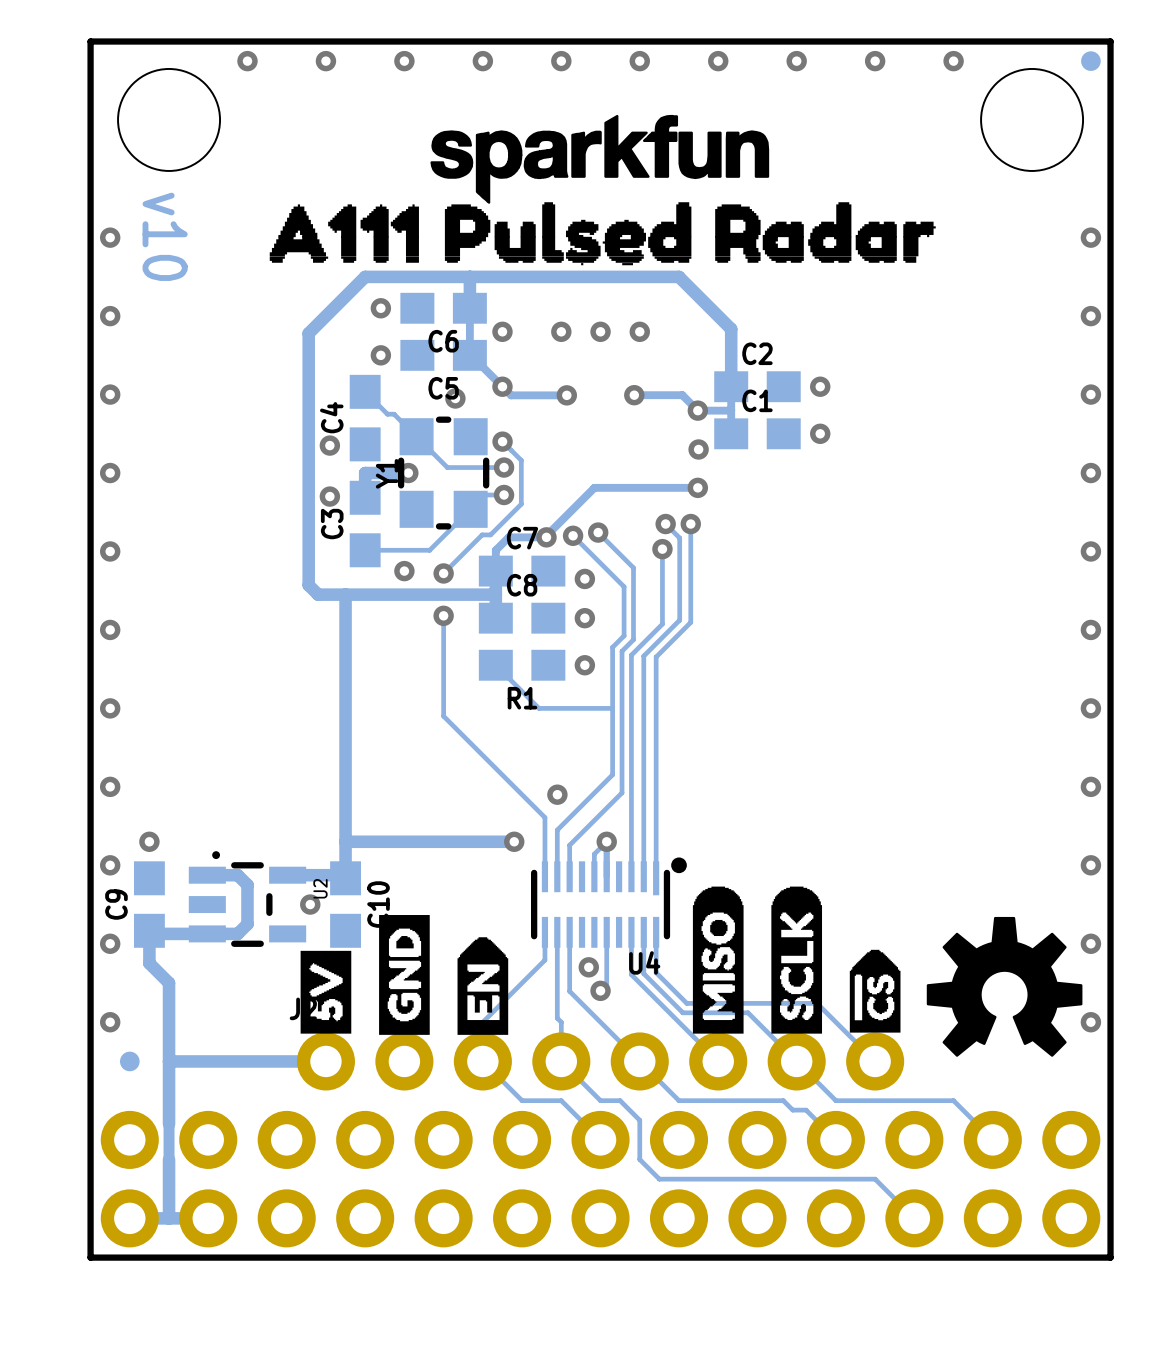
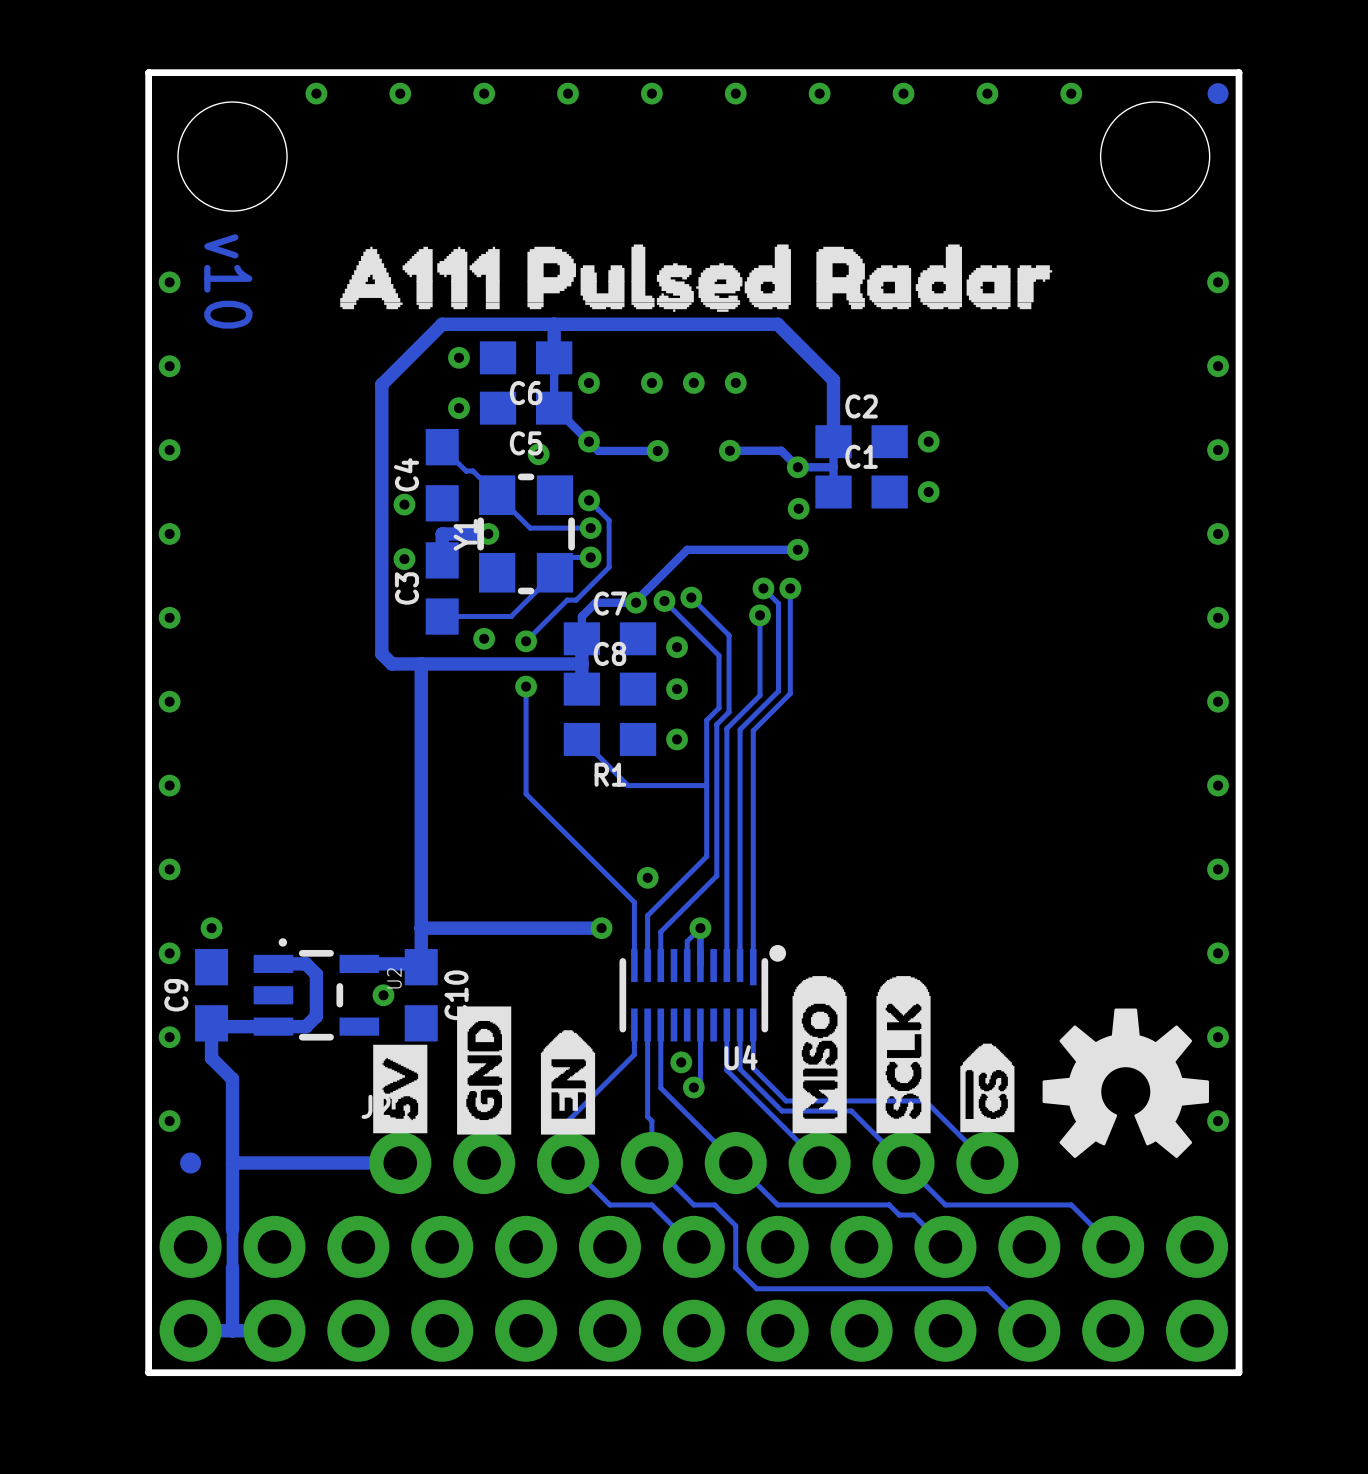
drawing: [430, 114, 770, 204] -> none

